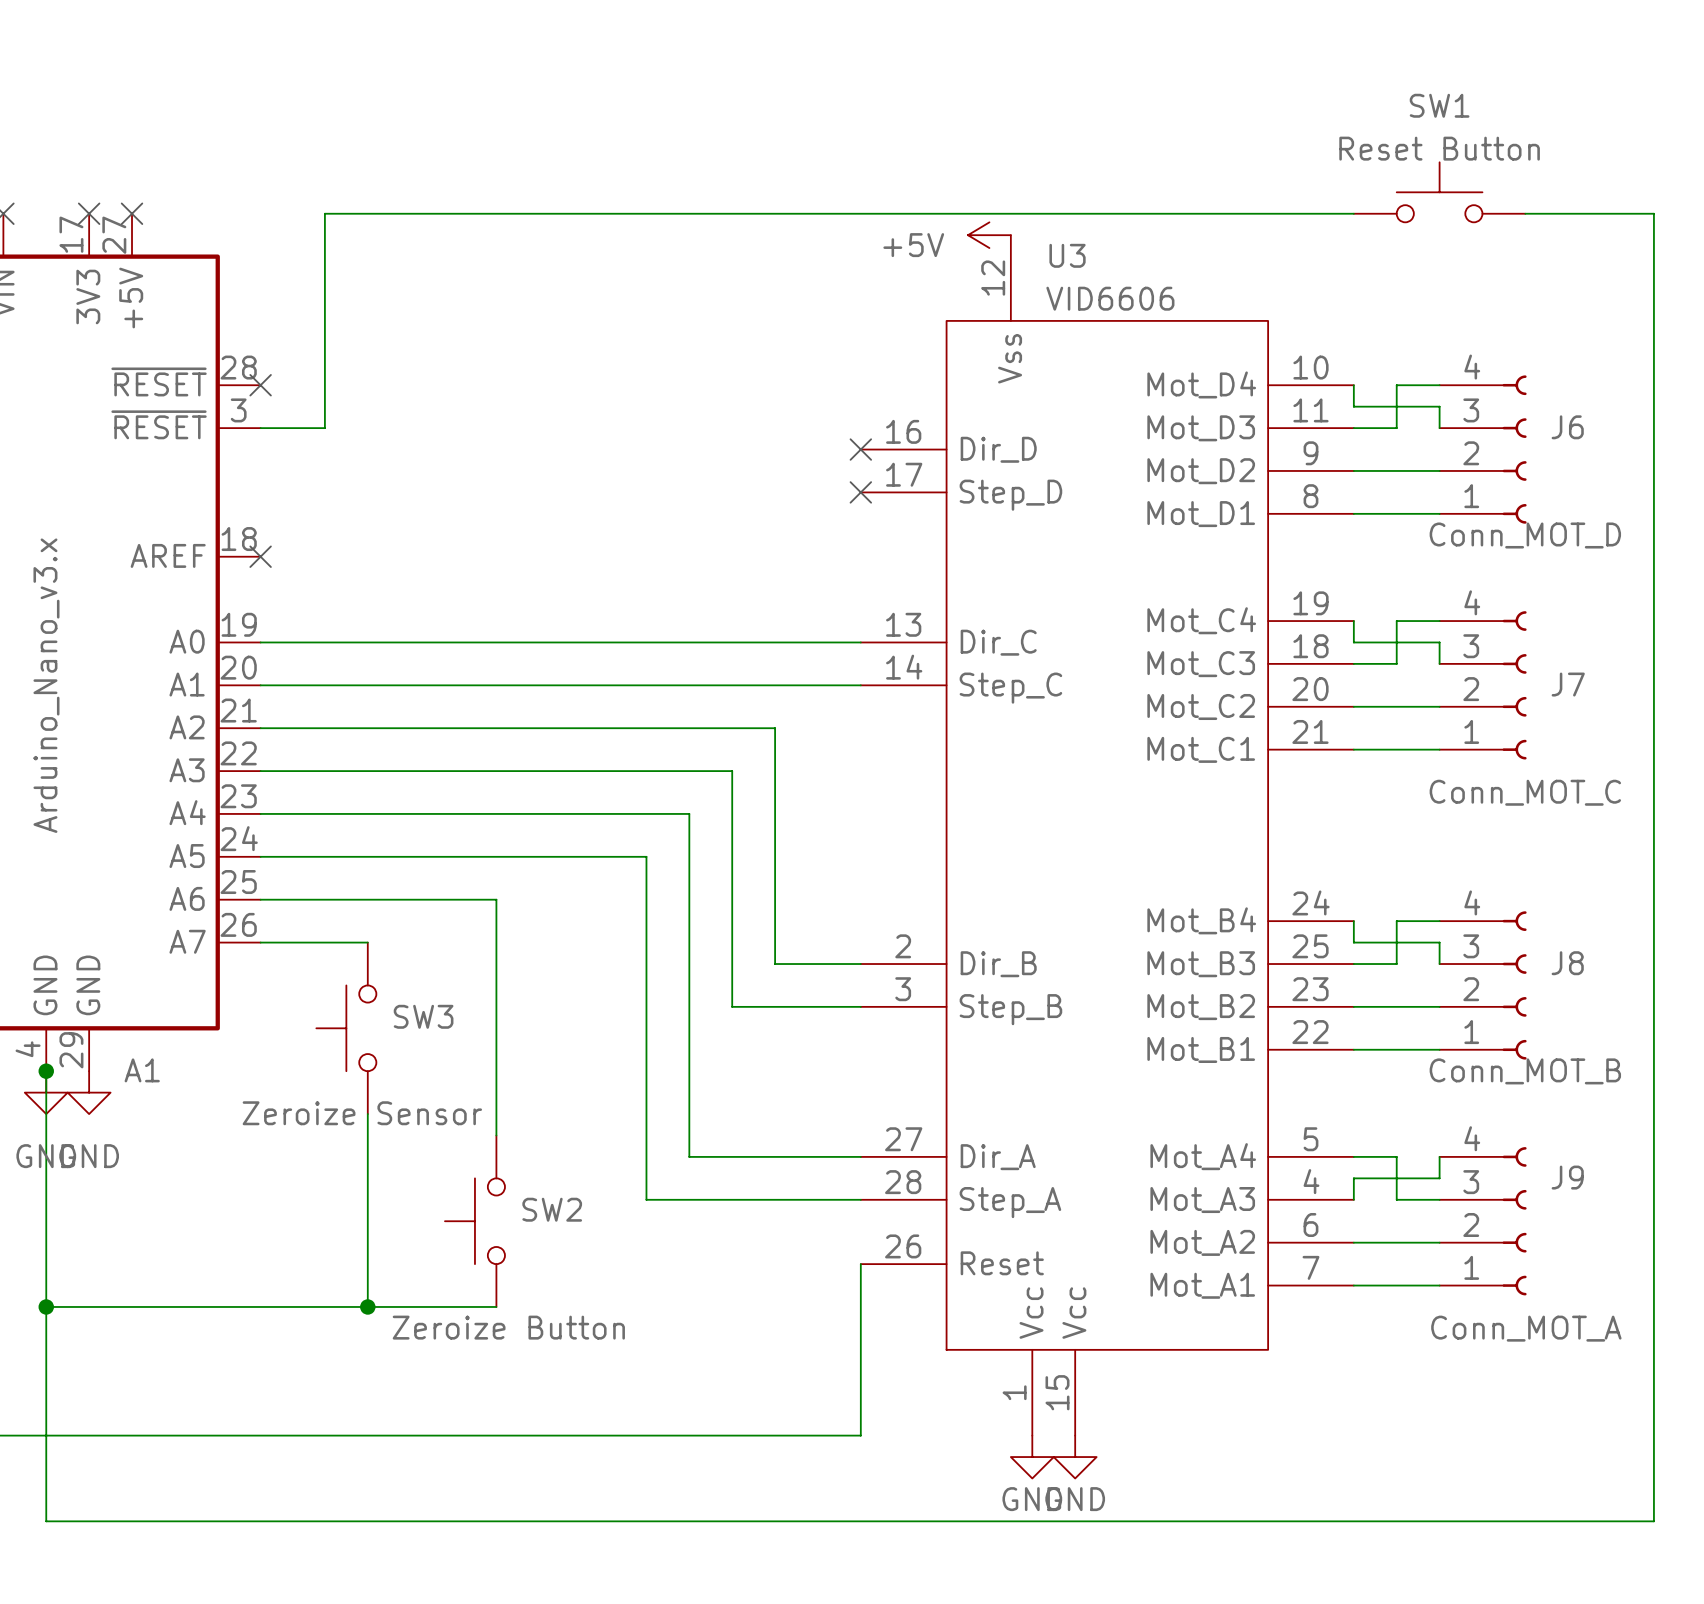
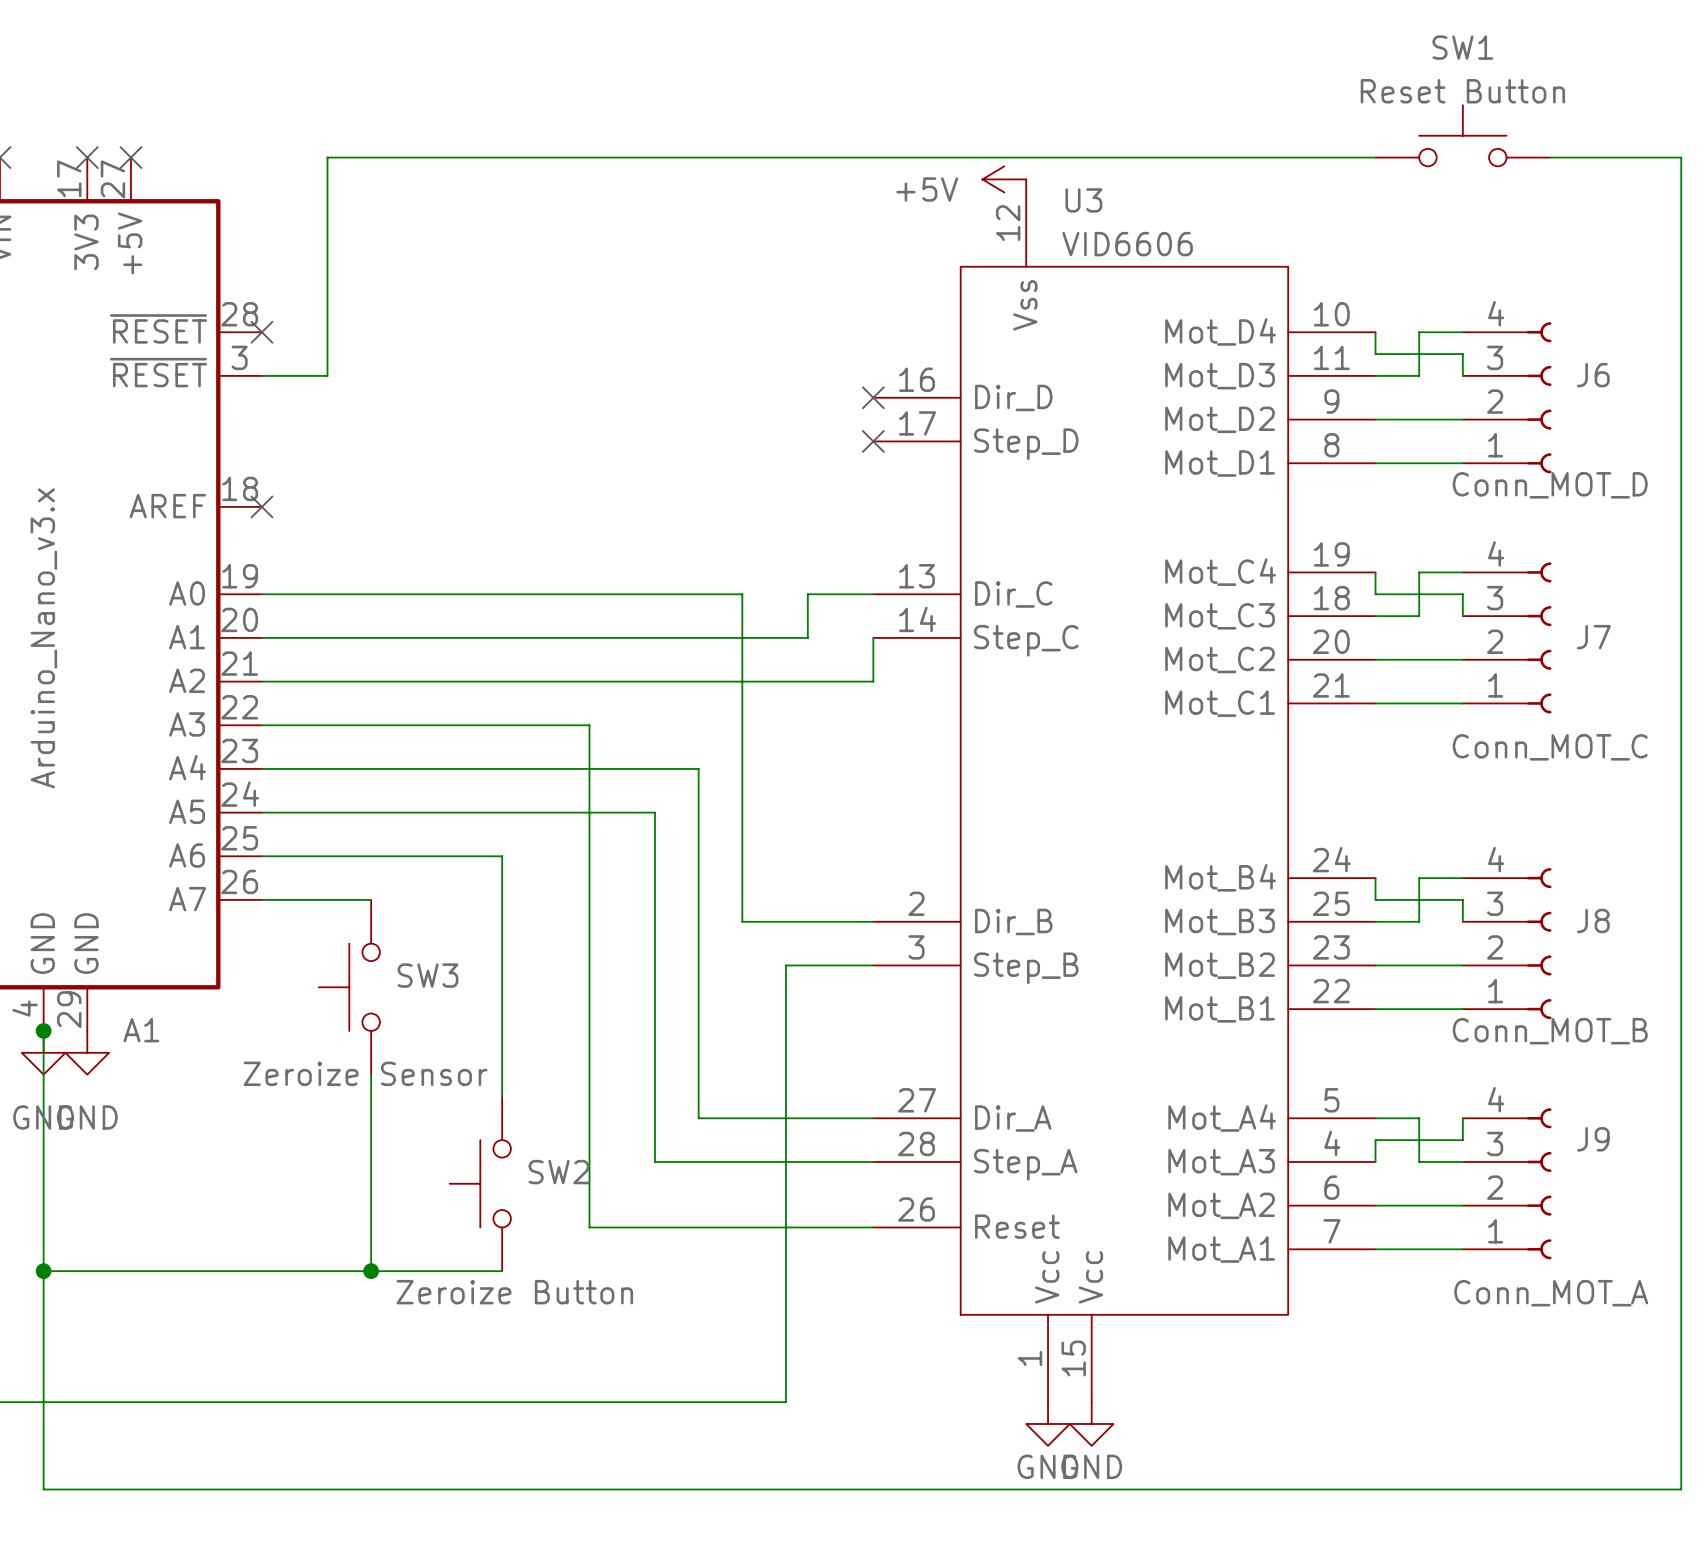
wire: (732, 642) (796, 642) -> (807, 637) (807, 594)
wire: (796, 685) (860, 685) -> (786, 681) (873, 681) (873, 637)
wire: (775, 728) (775, 964) -> none
wire: (582, 771) (732, 771) -> (742, 594) (742, 725)
wire: none -> (589, 725) (589, 1227) (873, 1227)
wire: (732, 964) (732, 1006) (775, 1006) -> (742, 921) (786, 921)
wire: (860, 1264) (860, 1435) (775, 1435) -> (786, 965) (786, 1402)

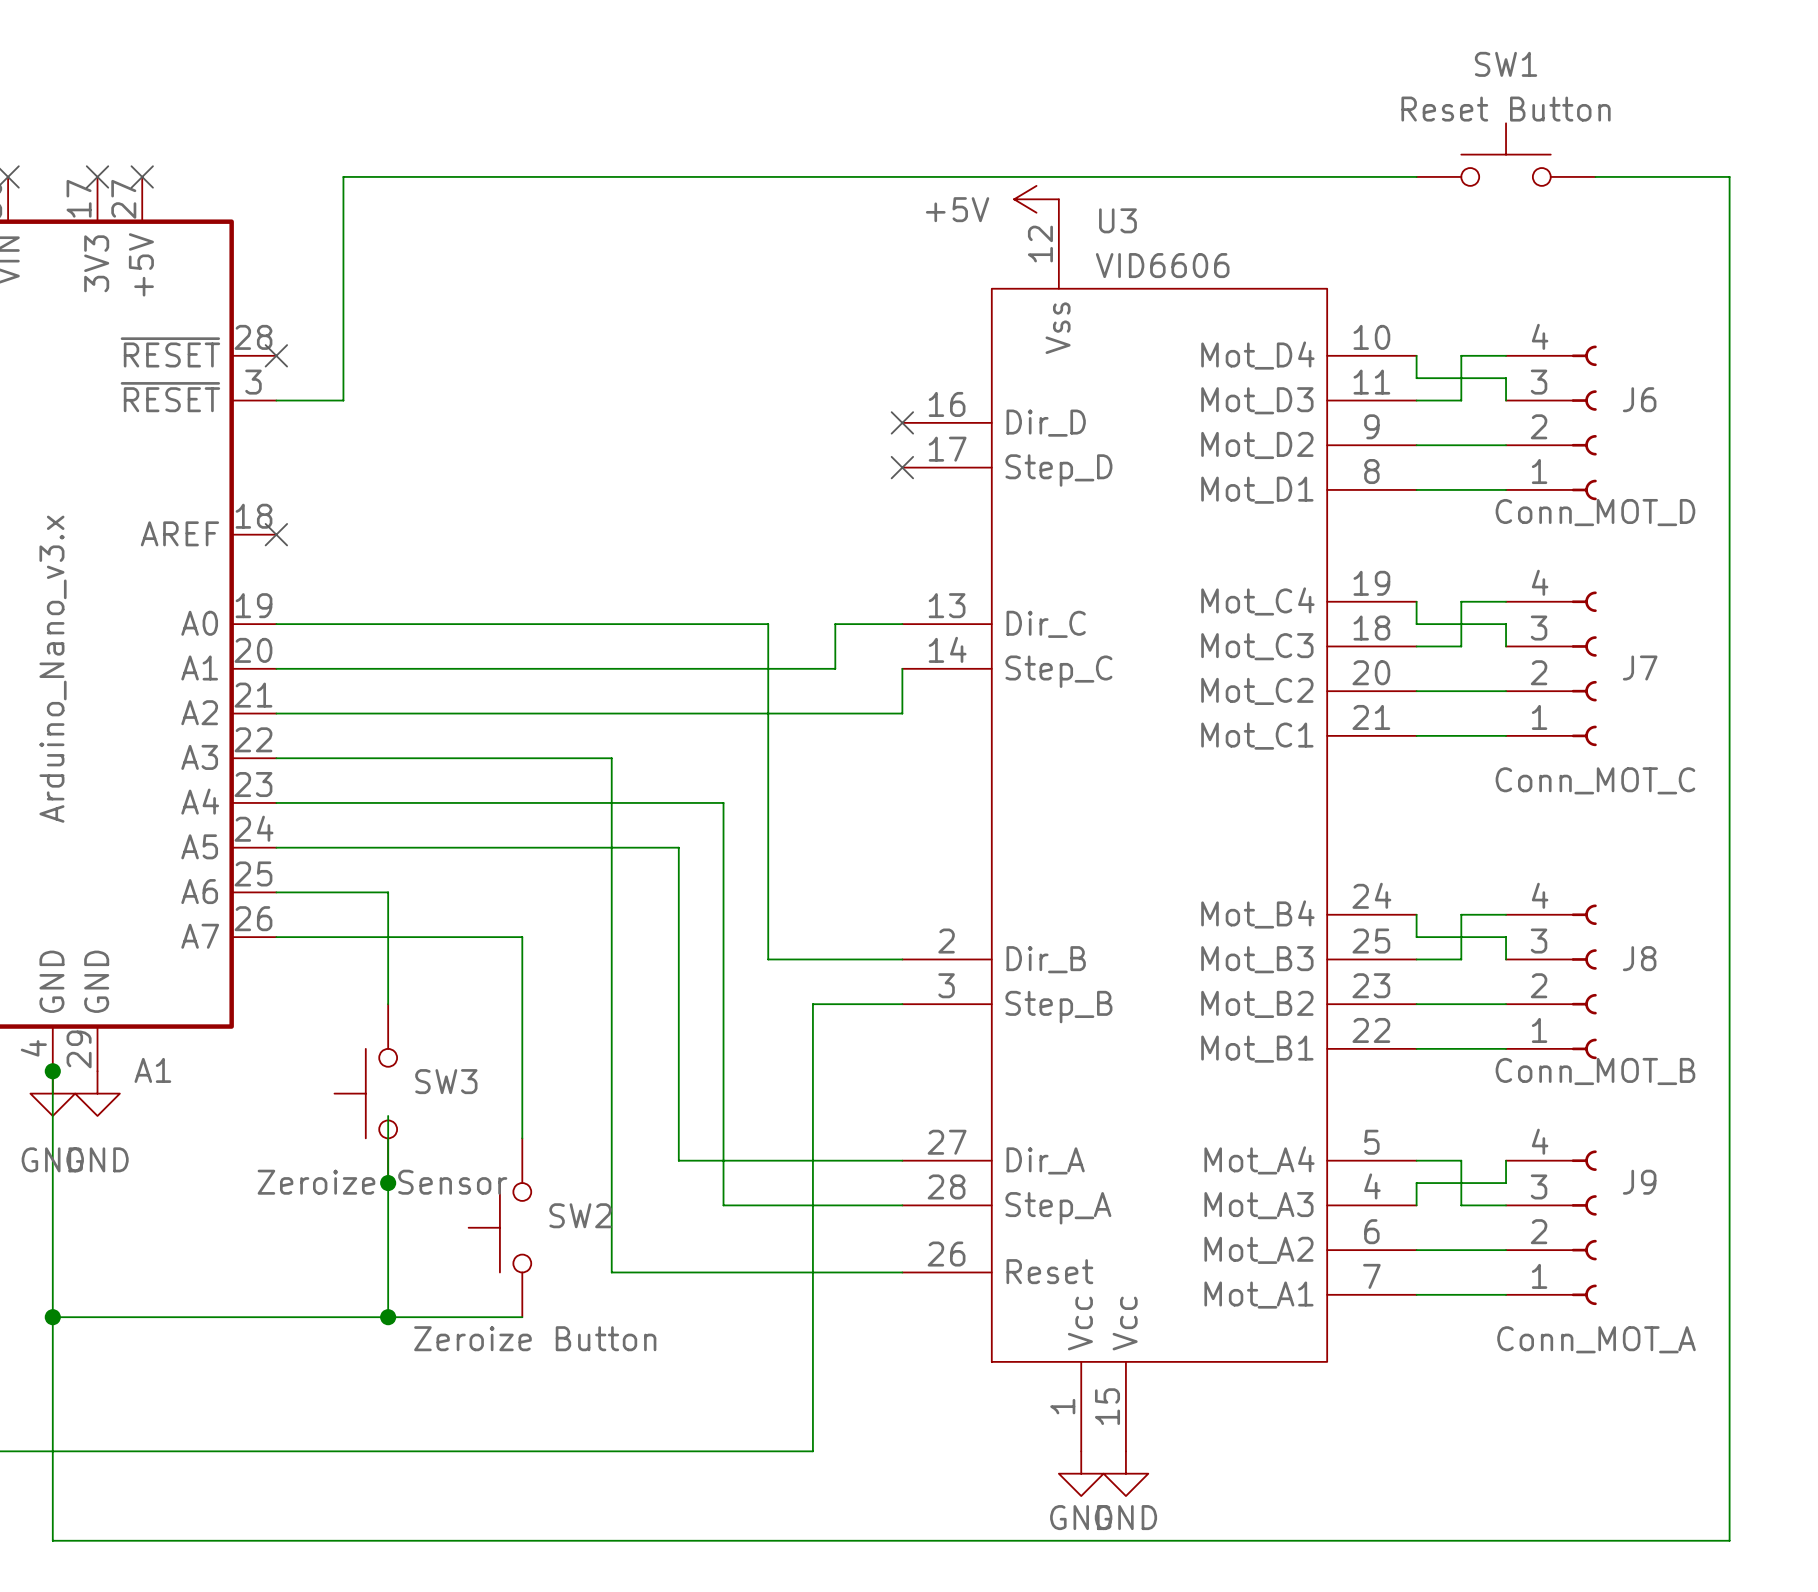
wire: (371, 856) (502, 856) (502, 899) -> (388, 937) (522, 937)
wire: none -> (388, 892) (388, 1004)
SW3 position: (349, 987) -> (365, 1093)
wire: (654, 1118) (654, 1161) (698, 1161) -> (678, 1160) (723, 1160) (723, 1205)
junction: none -> (388, 1183)

